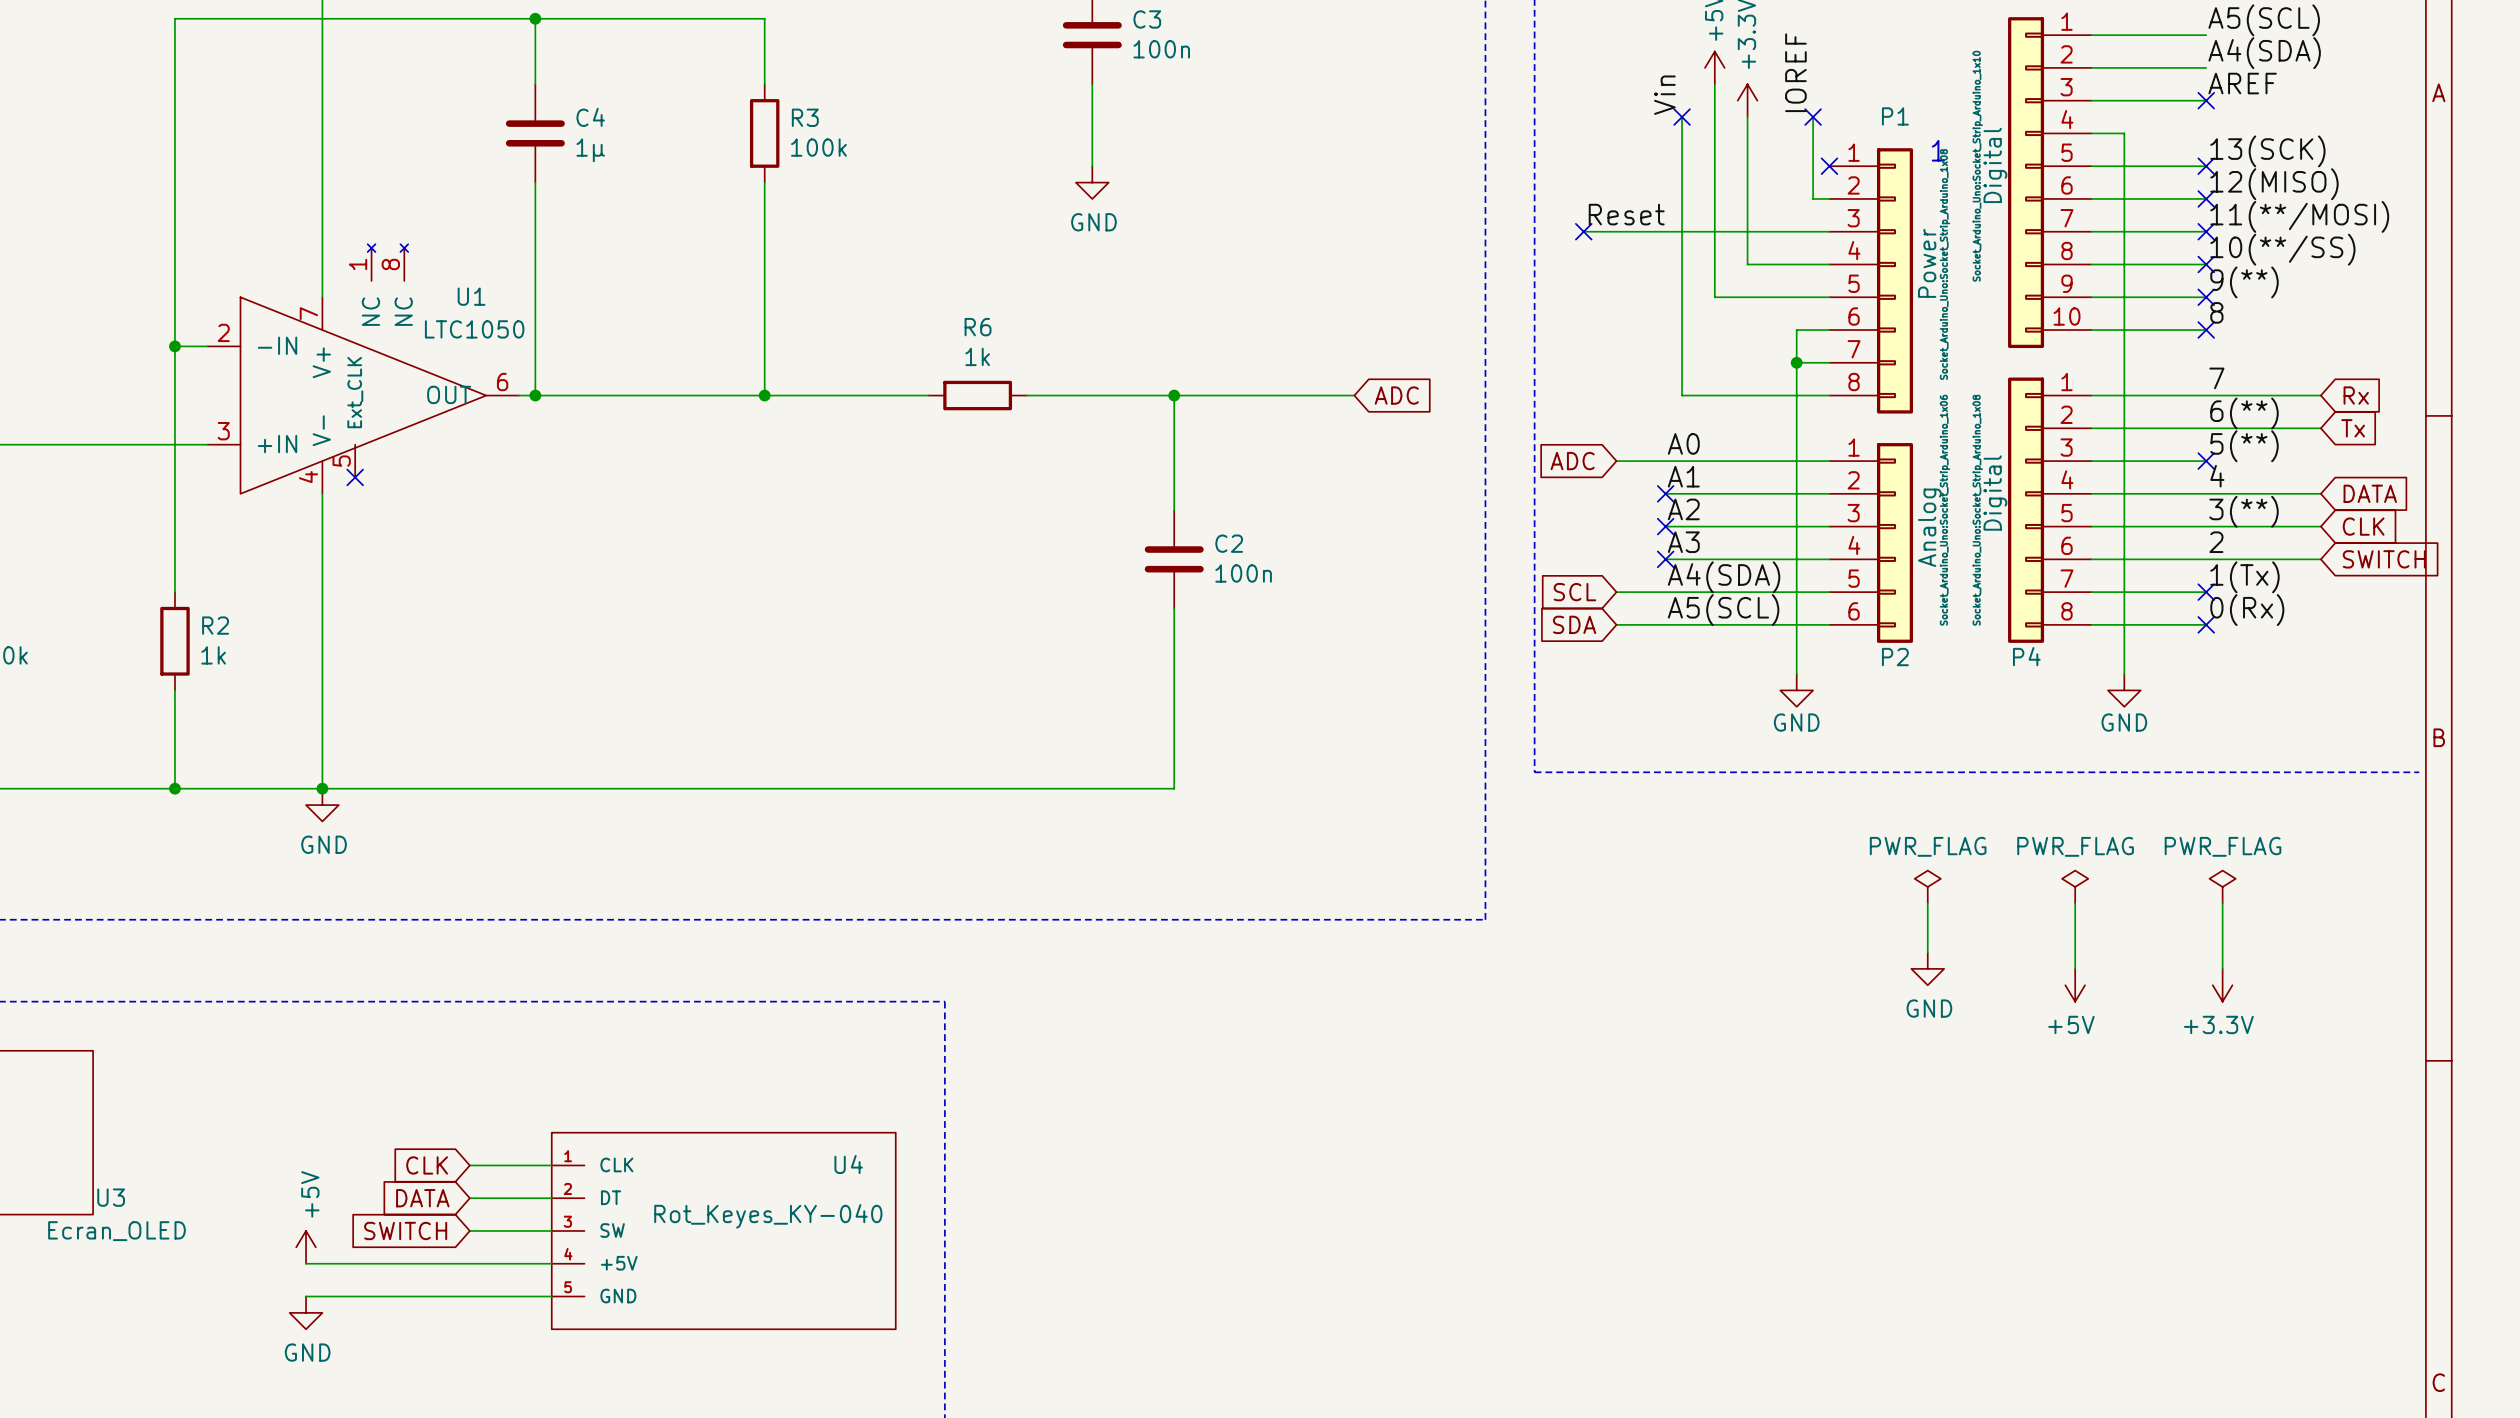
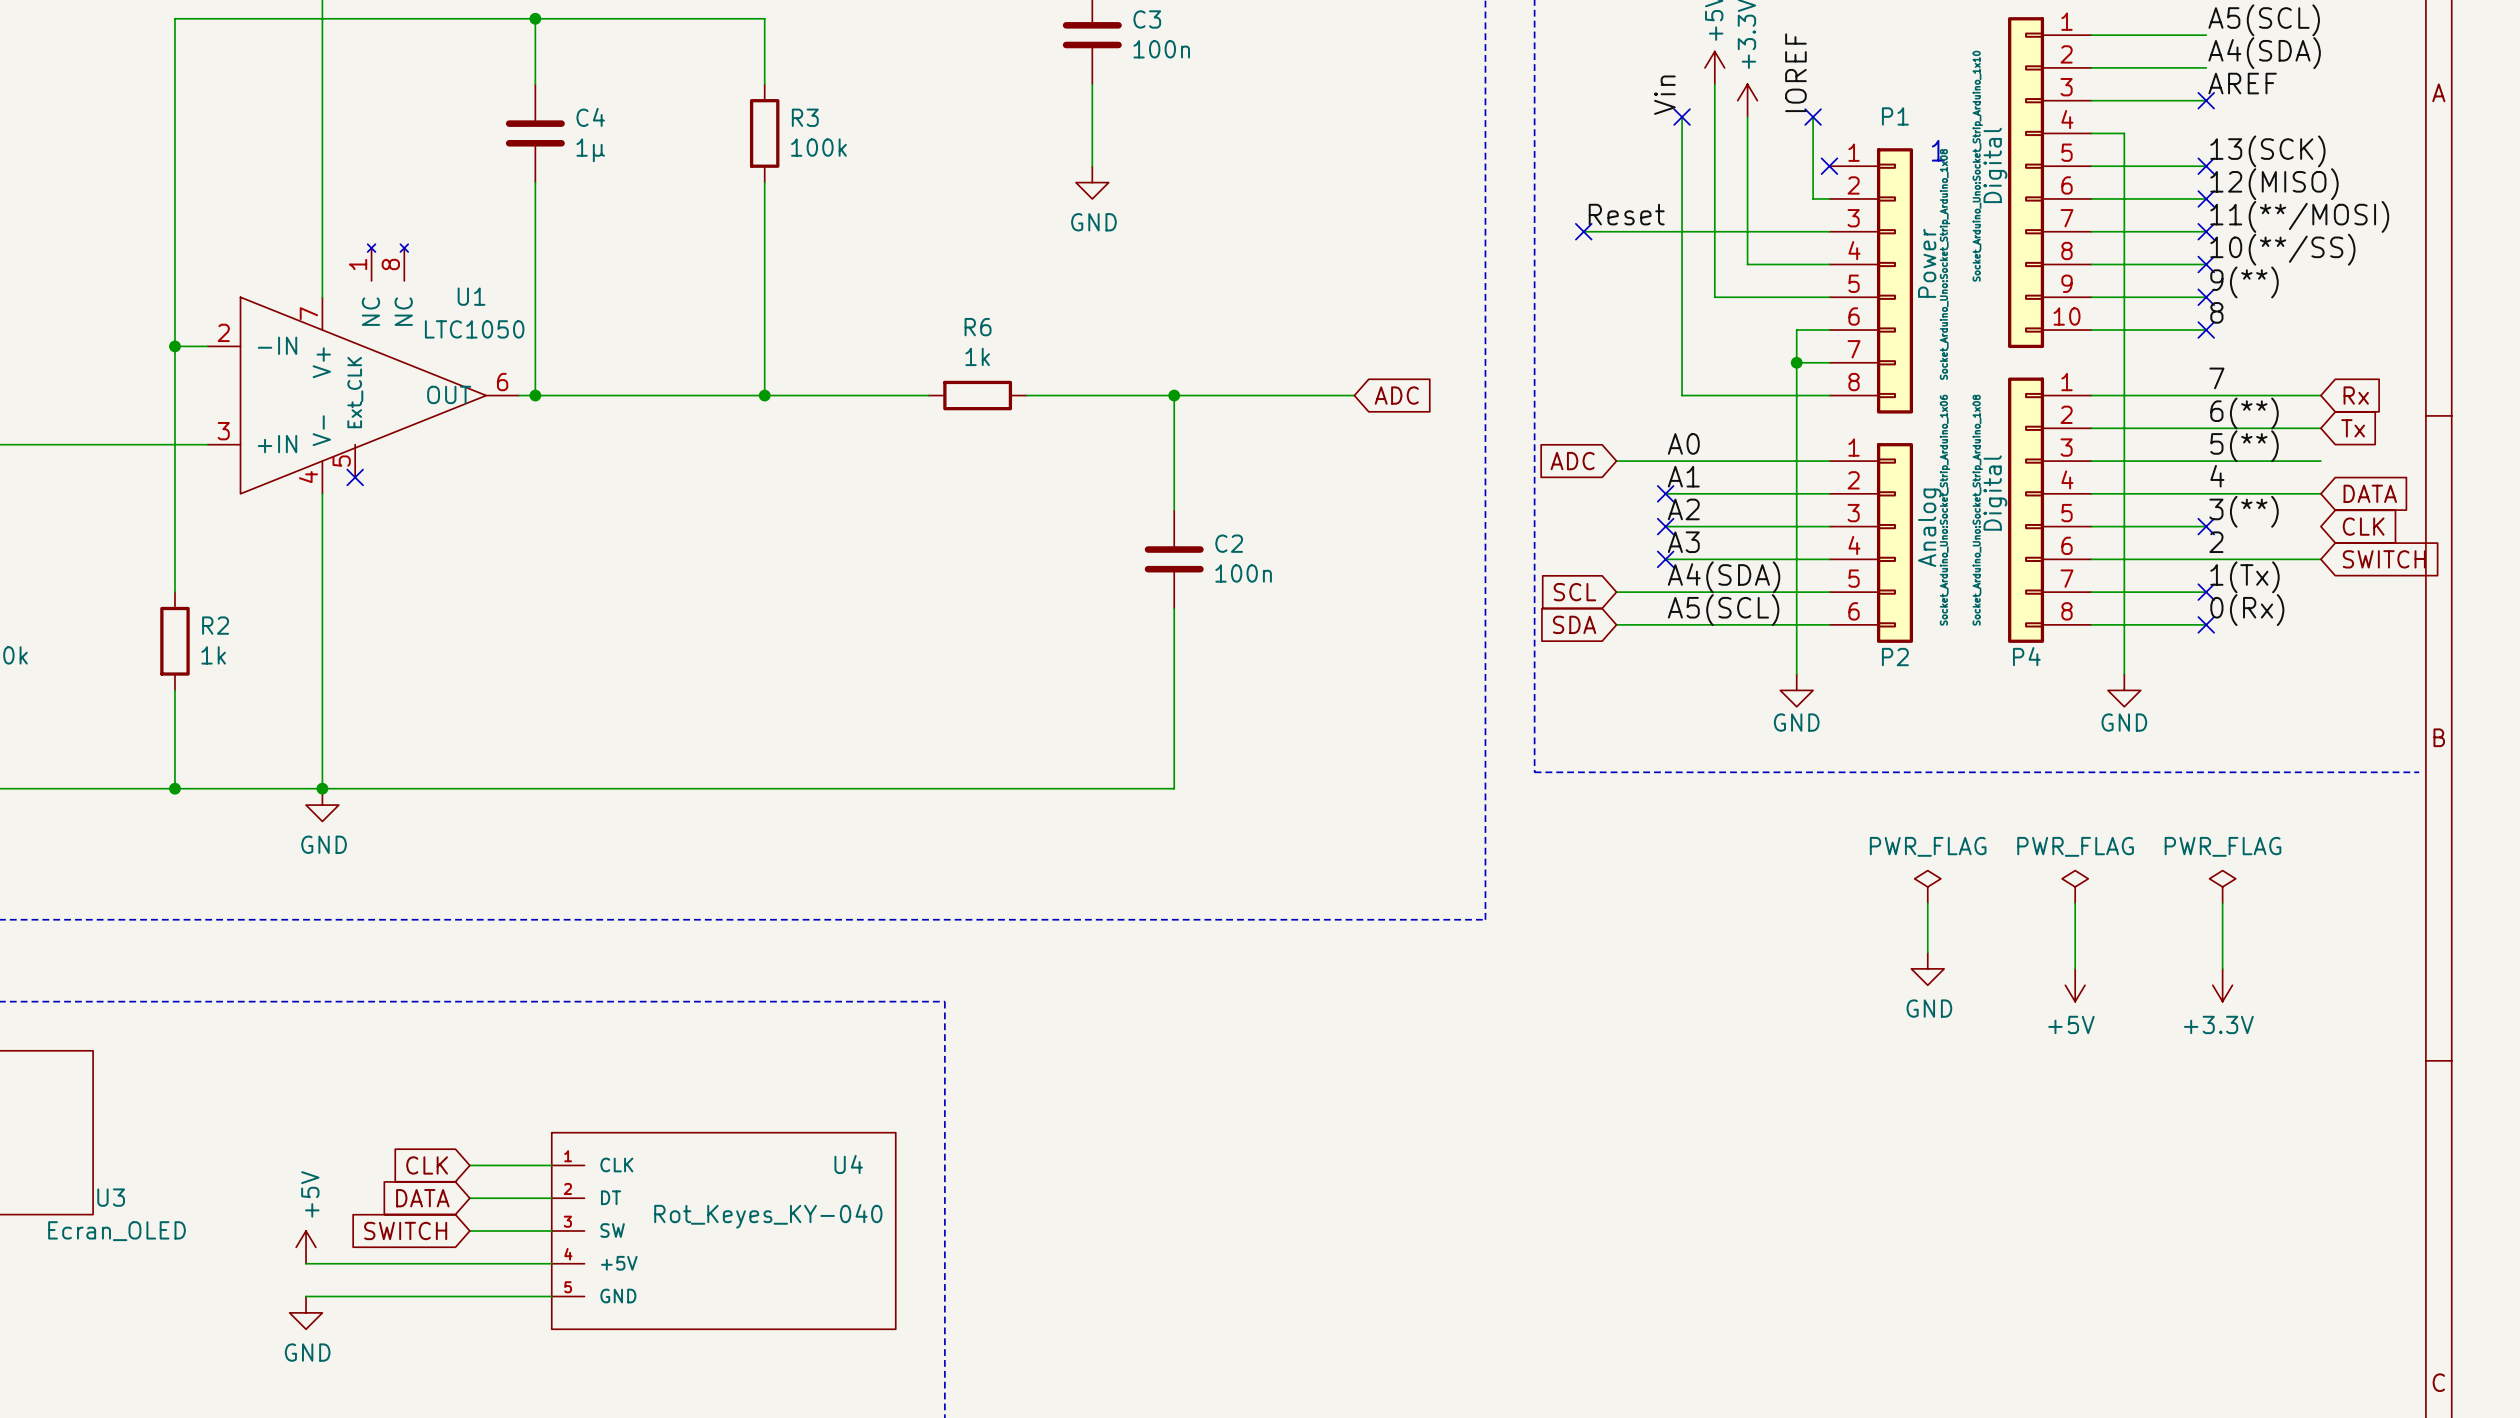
no-connect mark position: (2206, 461) -> (2206, 526)
wire: (2206, 526) (2320, 526) -> (2206, 461) (2320, 461)

